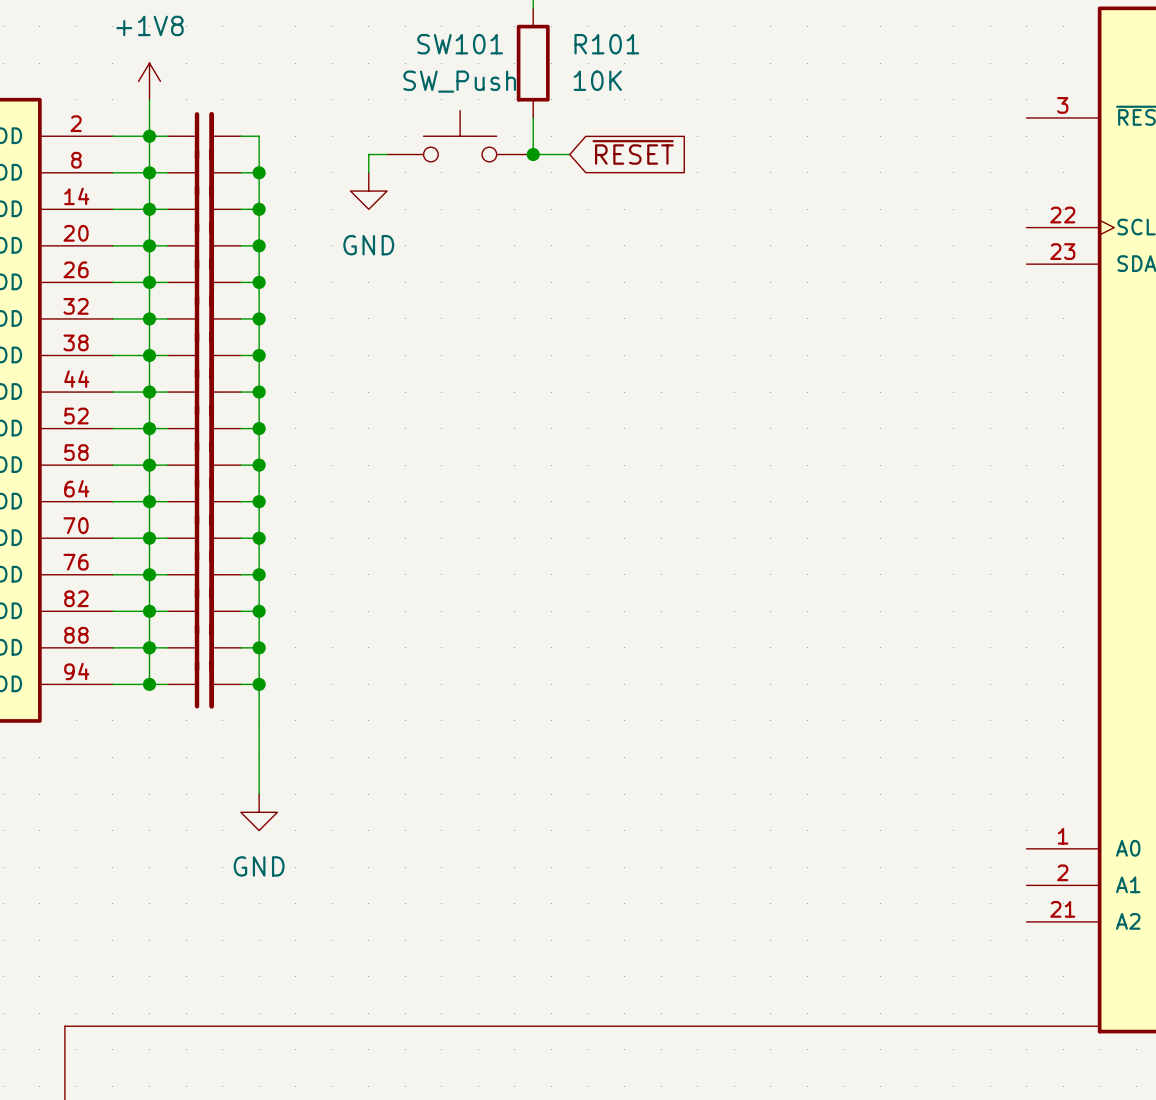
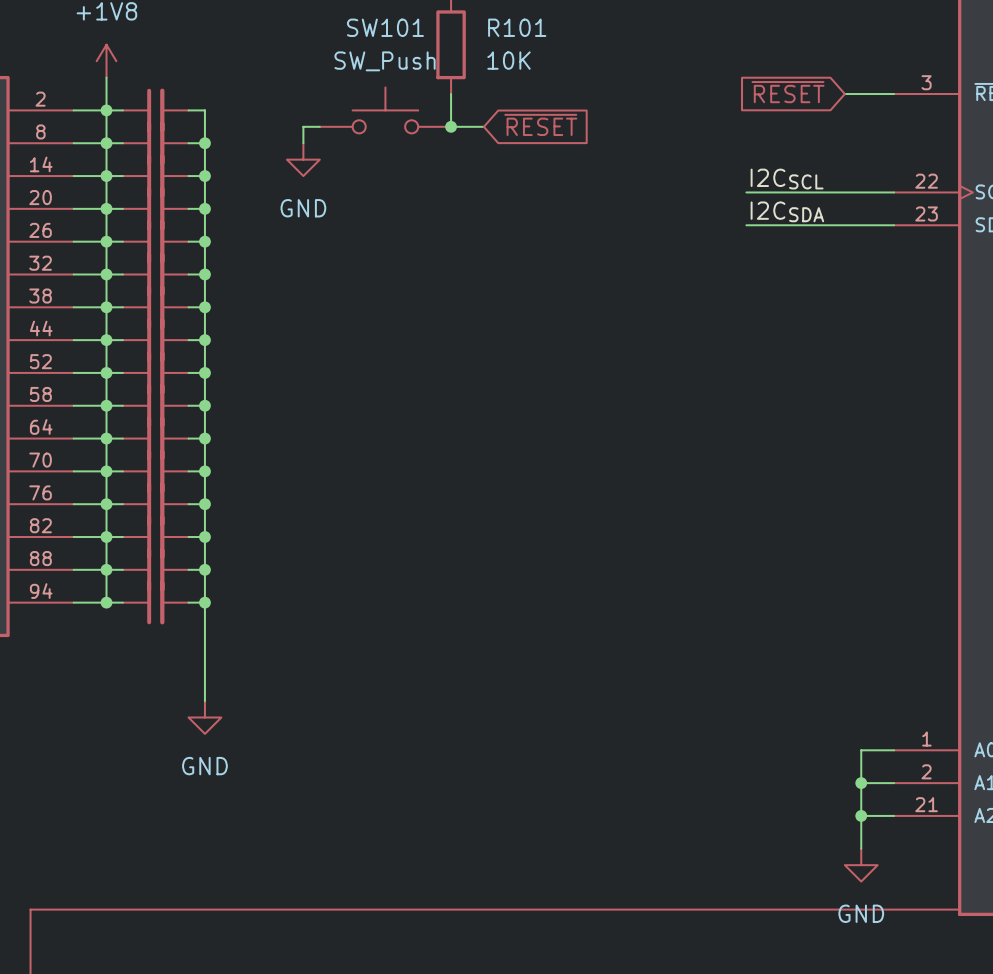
global label: none -> ~{RESET} (788, 92)
wire: none -> (844, 94) (894, 94)
label: none -> I2CSCL (787, 179)
wire: none -> (746, 192) (894, 192)
label: none -> I2CSDA (787, 211)
wire: none -> (746, 225) (894, 225)
wire: none -> (894, 750) (861, 750) (861, 848)
wire: none -> (861, 783) (894, 783)
junction: none -> (861, 783)
wire: none -> (861, 815) (894, 815)
junction: none -> (861, 815)
power symbol: none -> GND (861, 865)

